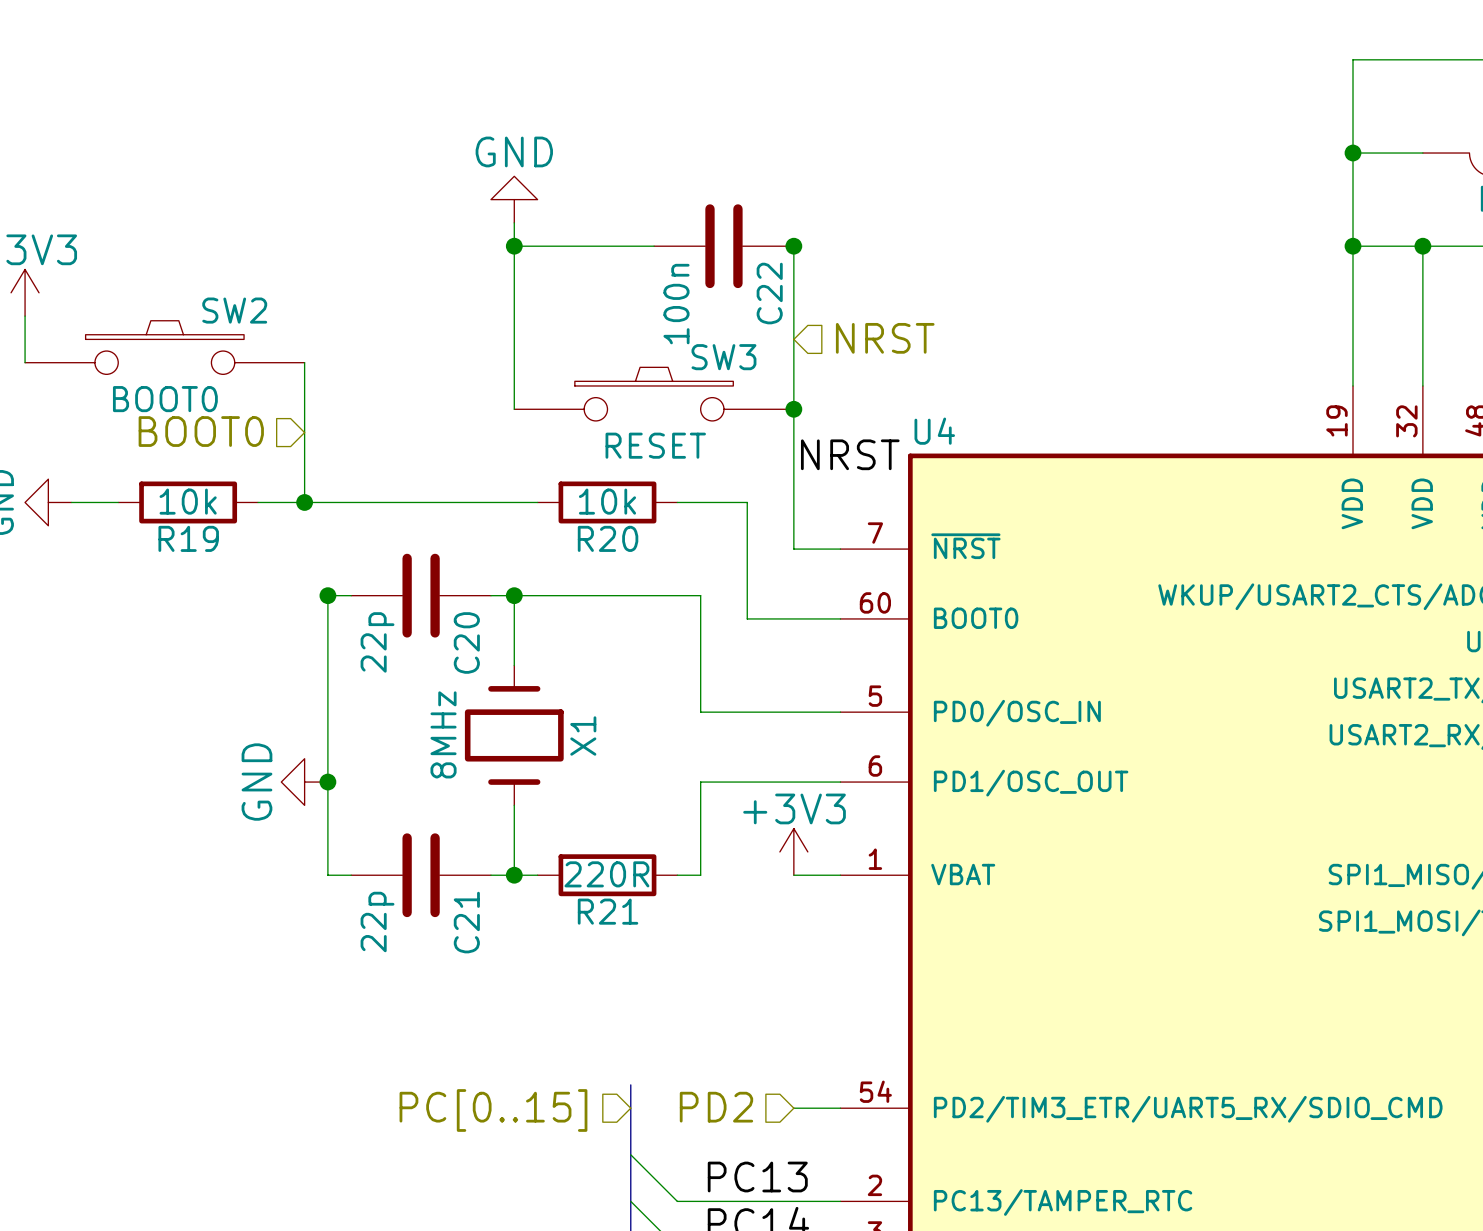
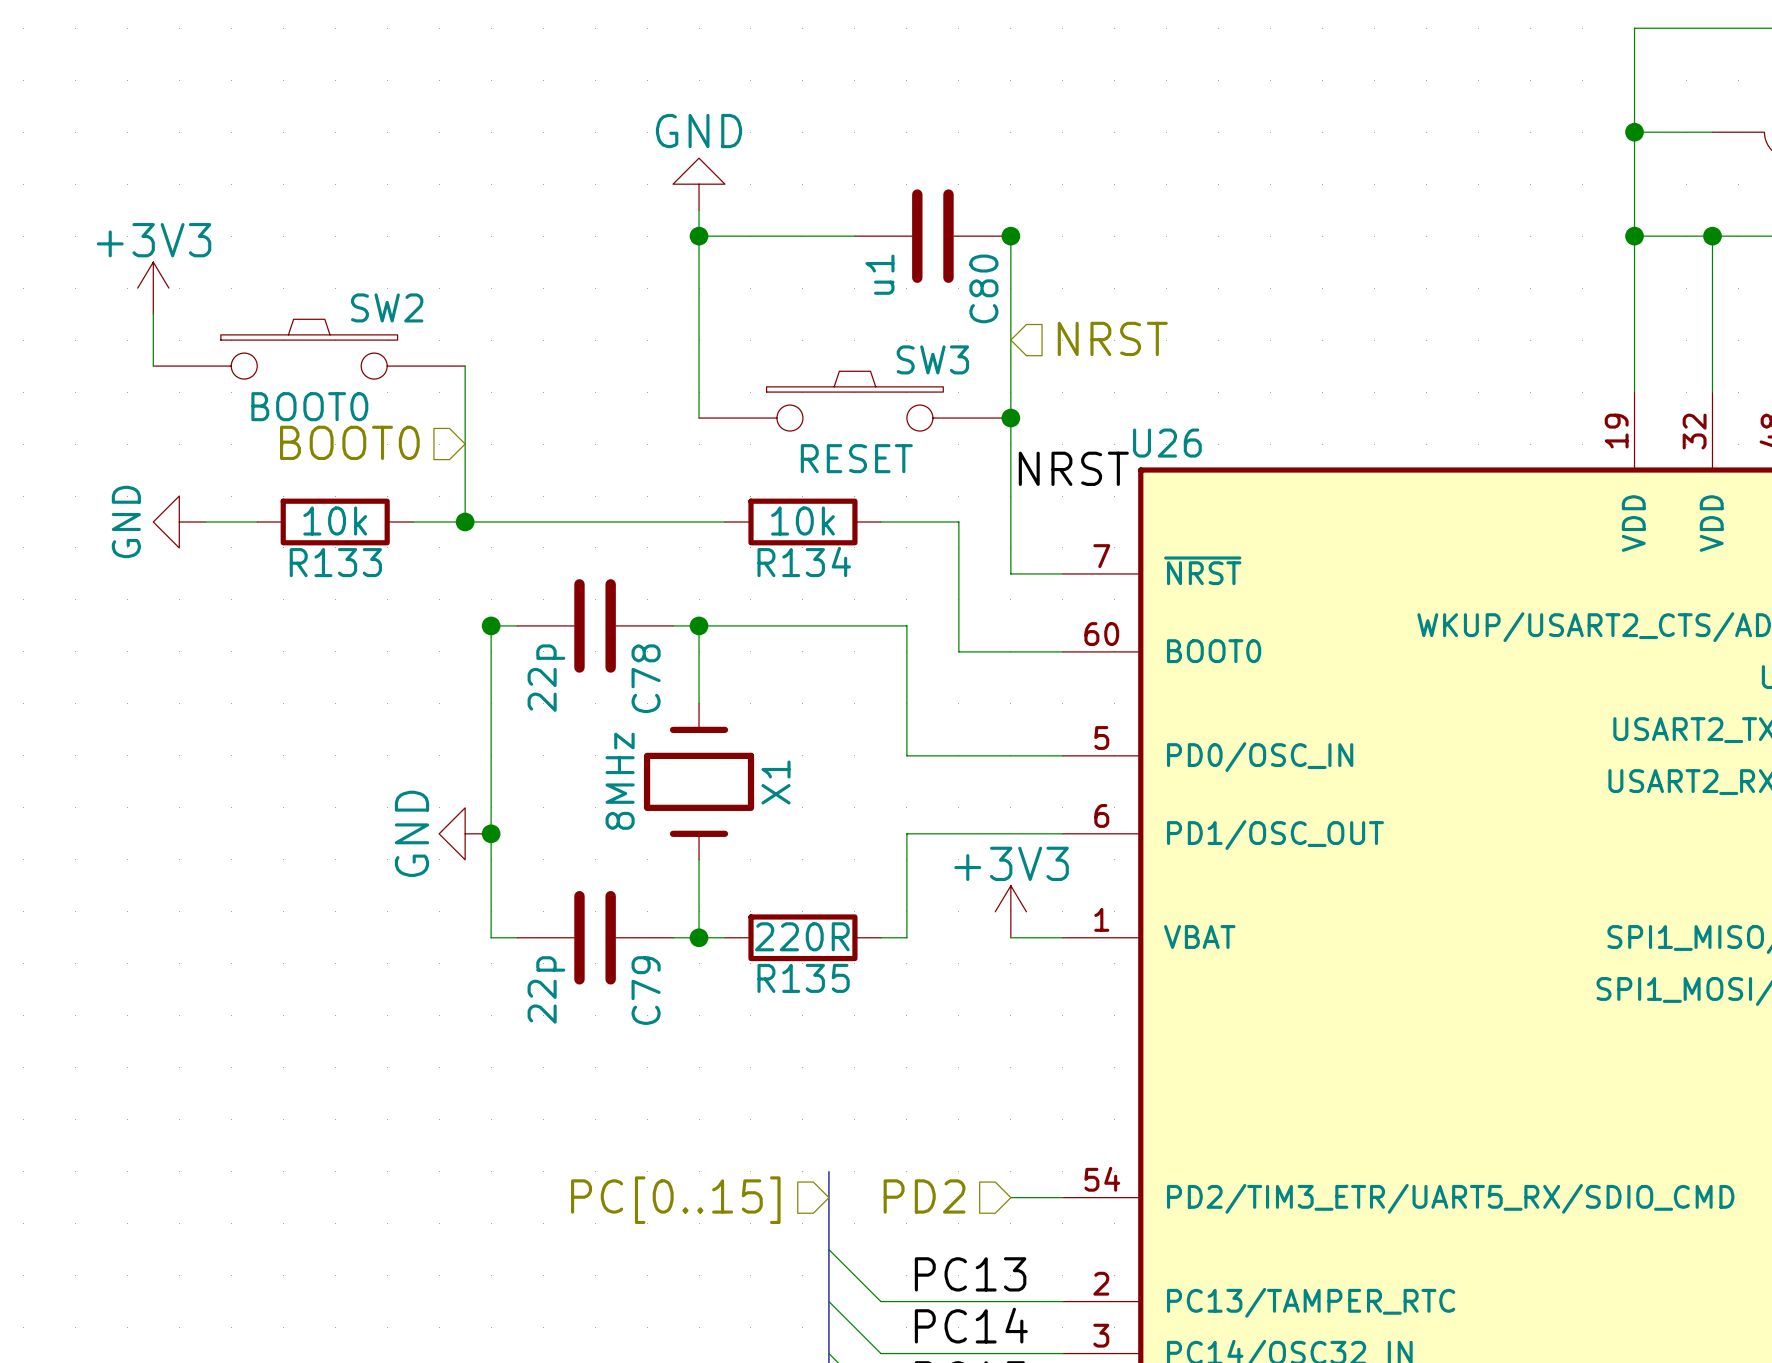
C22 name: C22 (769, 293) -> C80 (983, 288)
C22 value: 100n (676, 304) -> u1 (879, 274)
U4 name: U4 (934, 431) -> U26 (1167, 443)
R19 name: R19 (188, 538) -> R133 (335, 562)
R20 name: R20 (608, 538) -> R134 (804, 561)
C20 name: C20 (466, 642) -> C78 (646, 678)
R21 name: R21 (608, 911) -> R135 (803, 978)
C21 name: C21 (466, 922) -> C79 (646, 990)

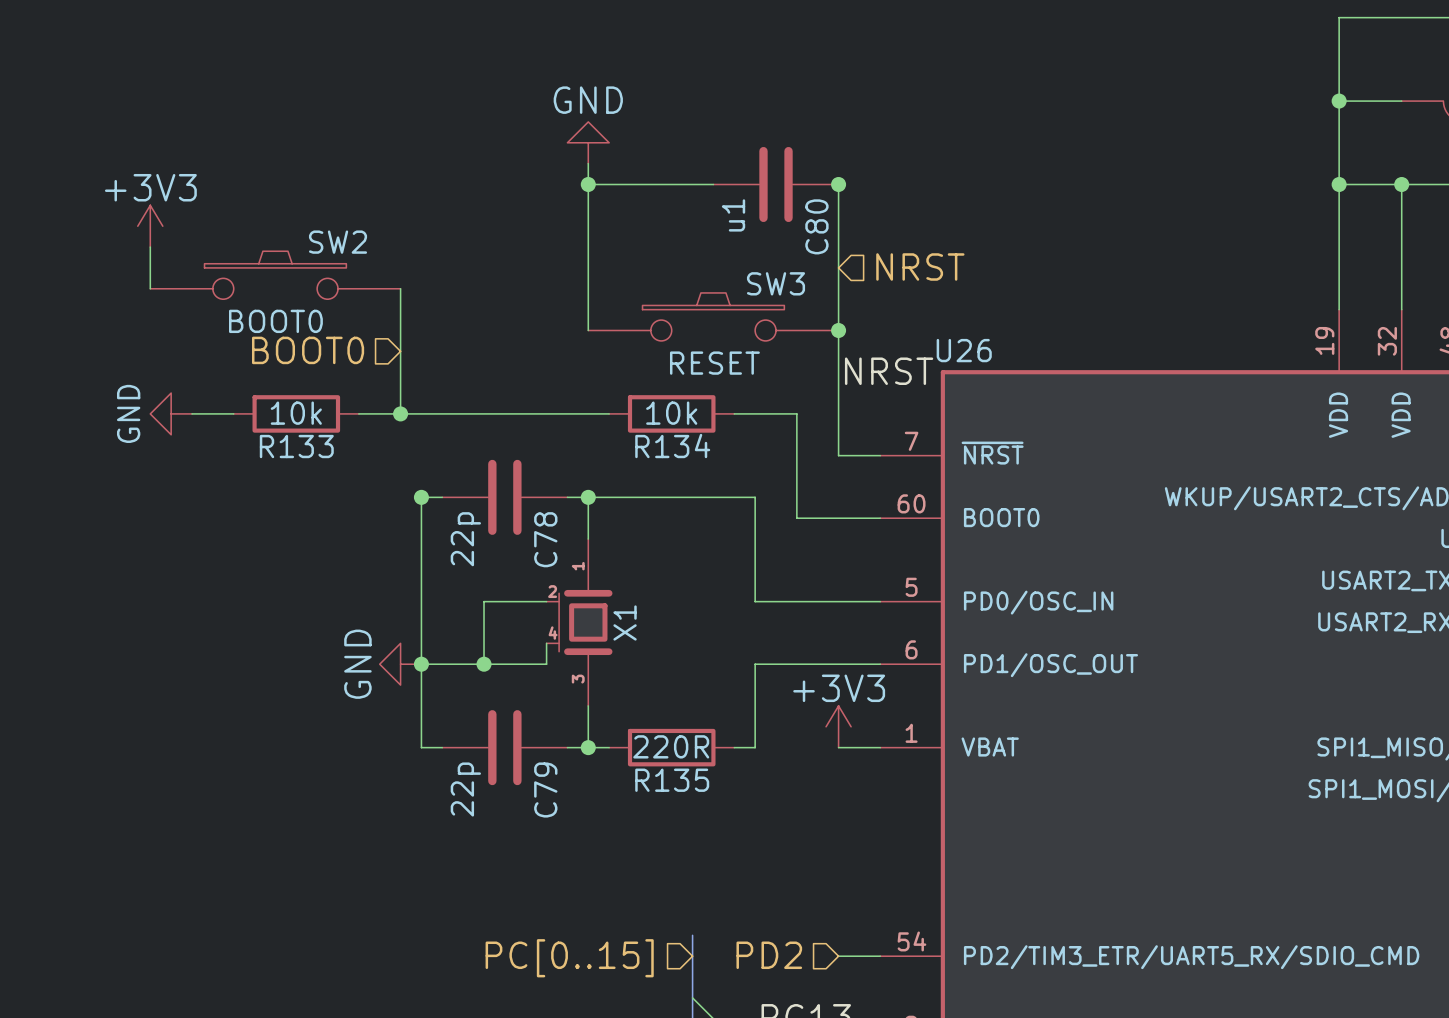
X1 symbol: [643, 703, 755, 860] -> [546, 539, 613, 706]
wire: none -> (546, 601) (484, 601) (484, 664)
X1 value: 8MHz (620, 781) -> none
wire: none -> (546, 643) (546, 664) (421, 664)
junction: none -> (484, 664)

